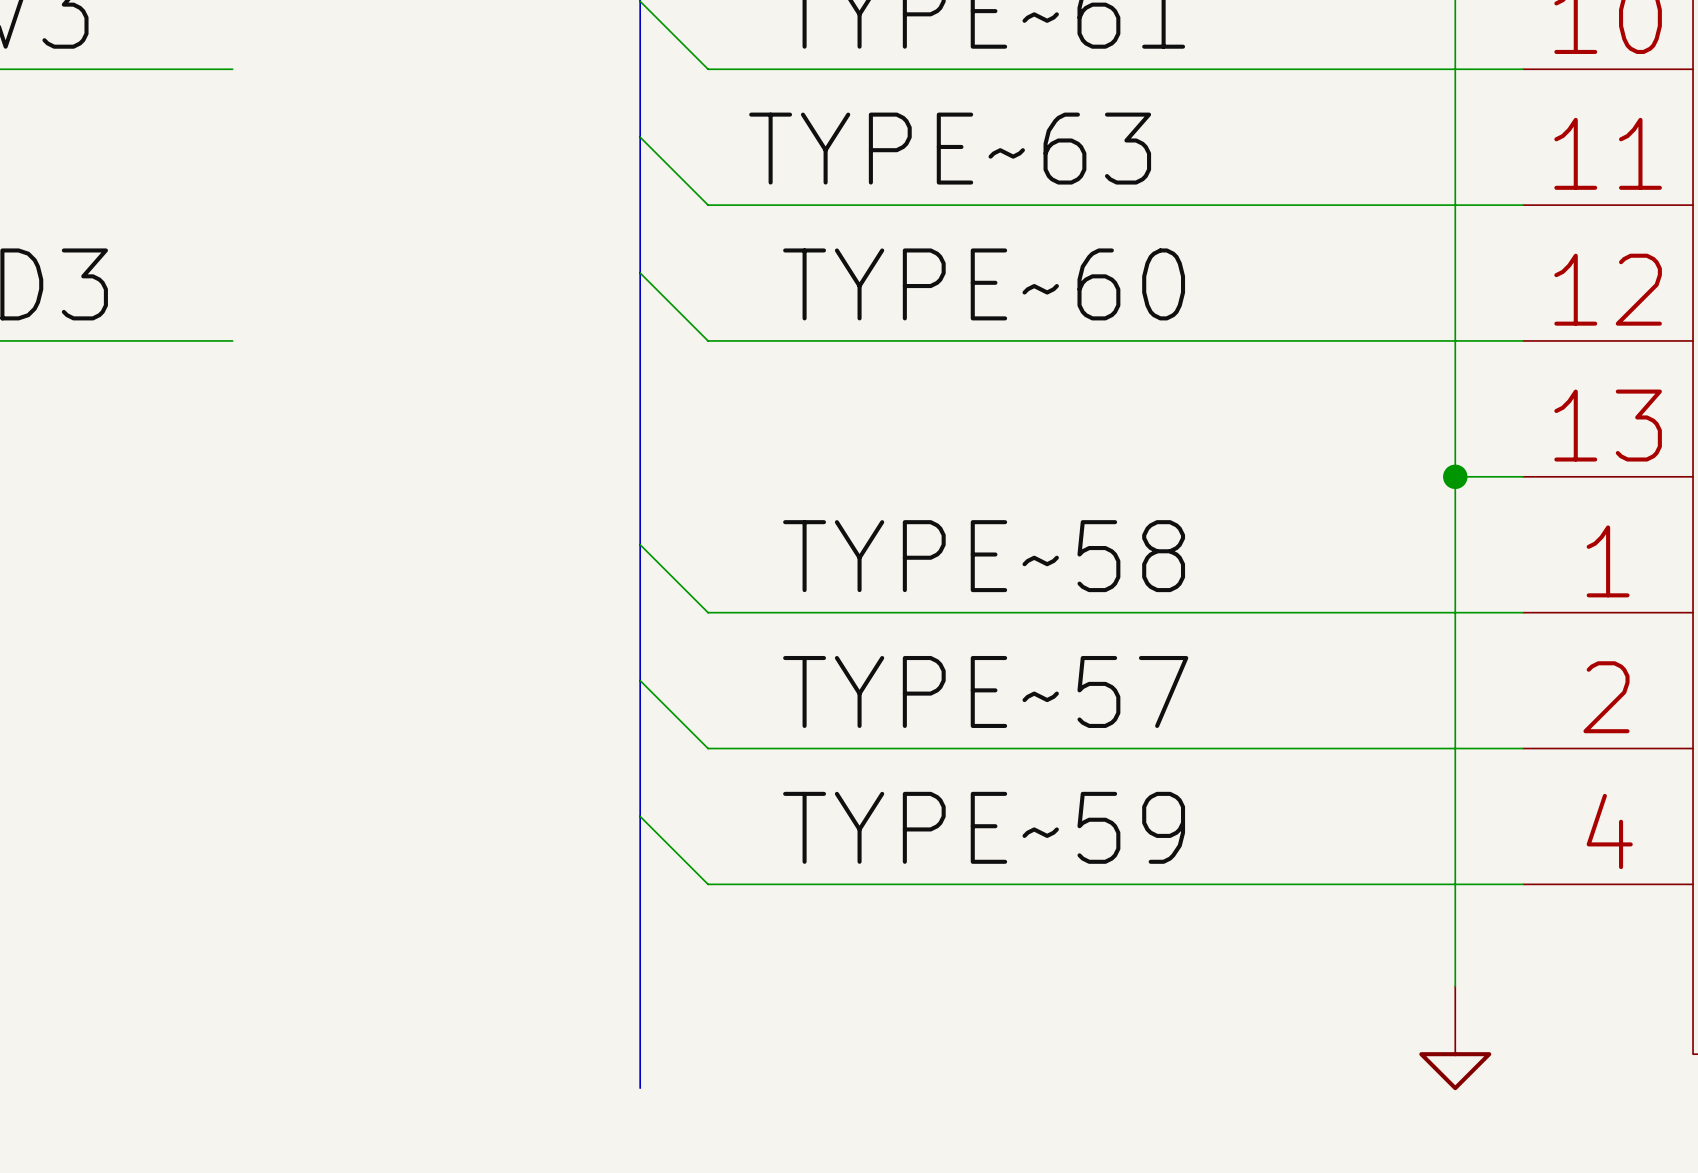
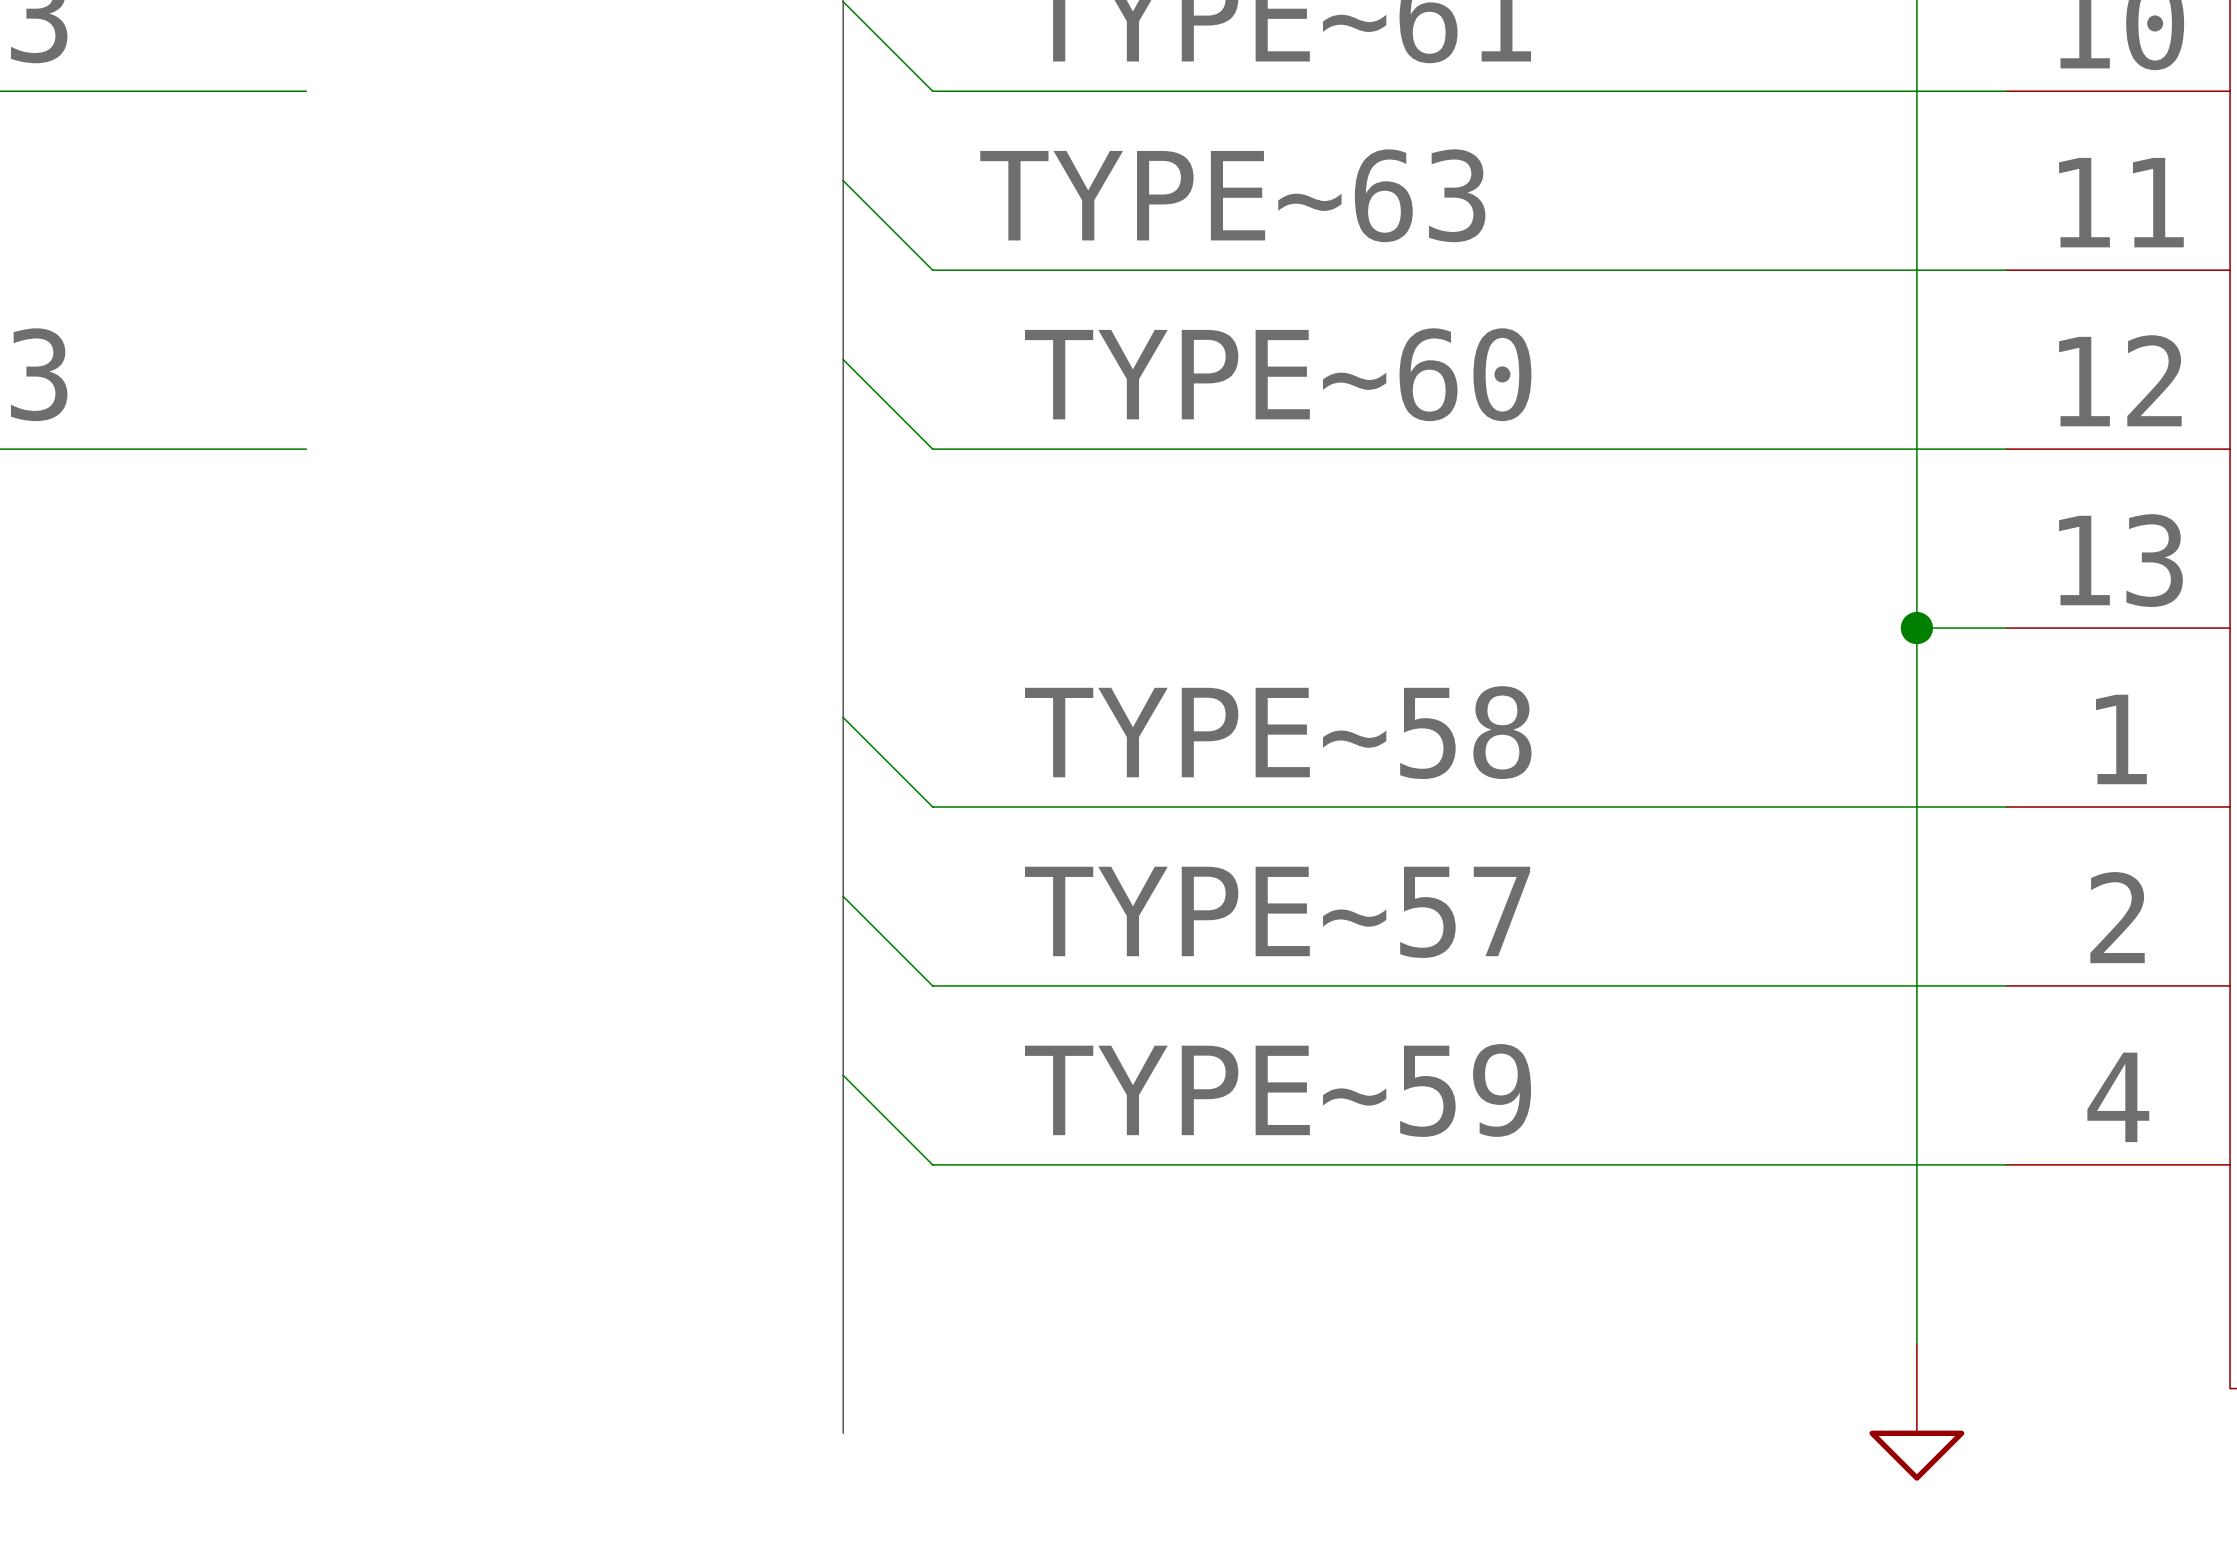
power symbol position: (1455, 1038) -> (1916, 1412)

